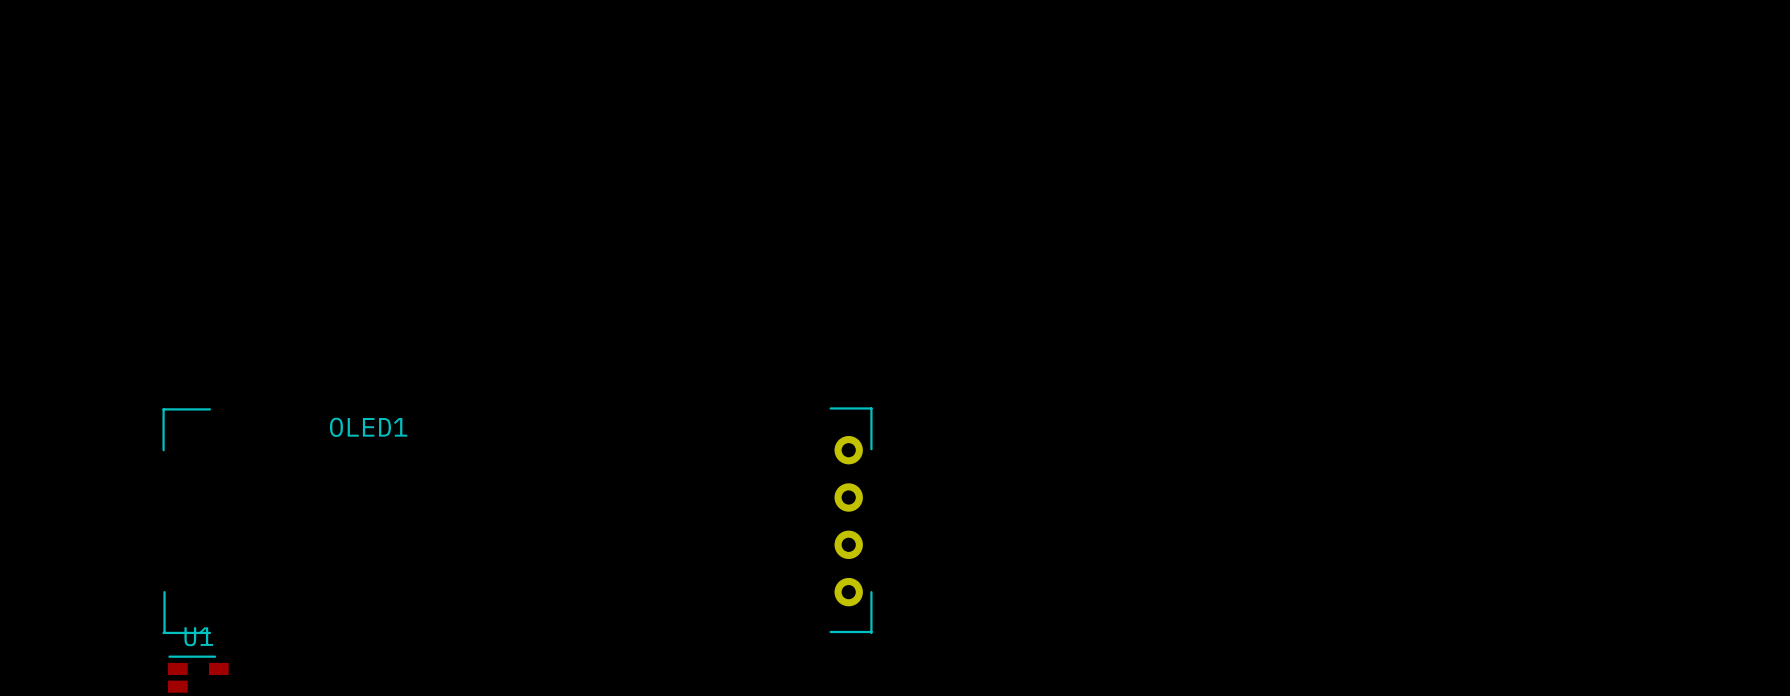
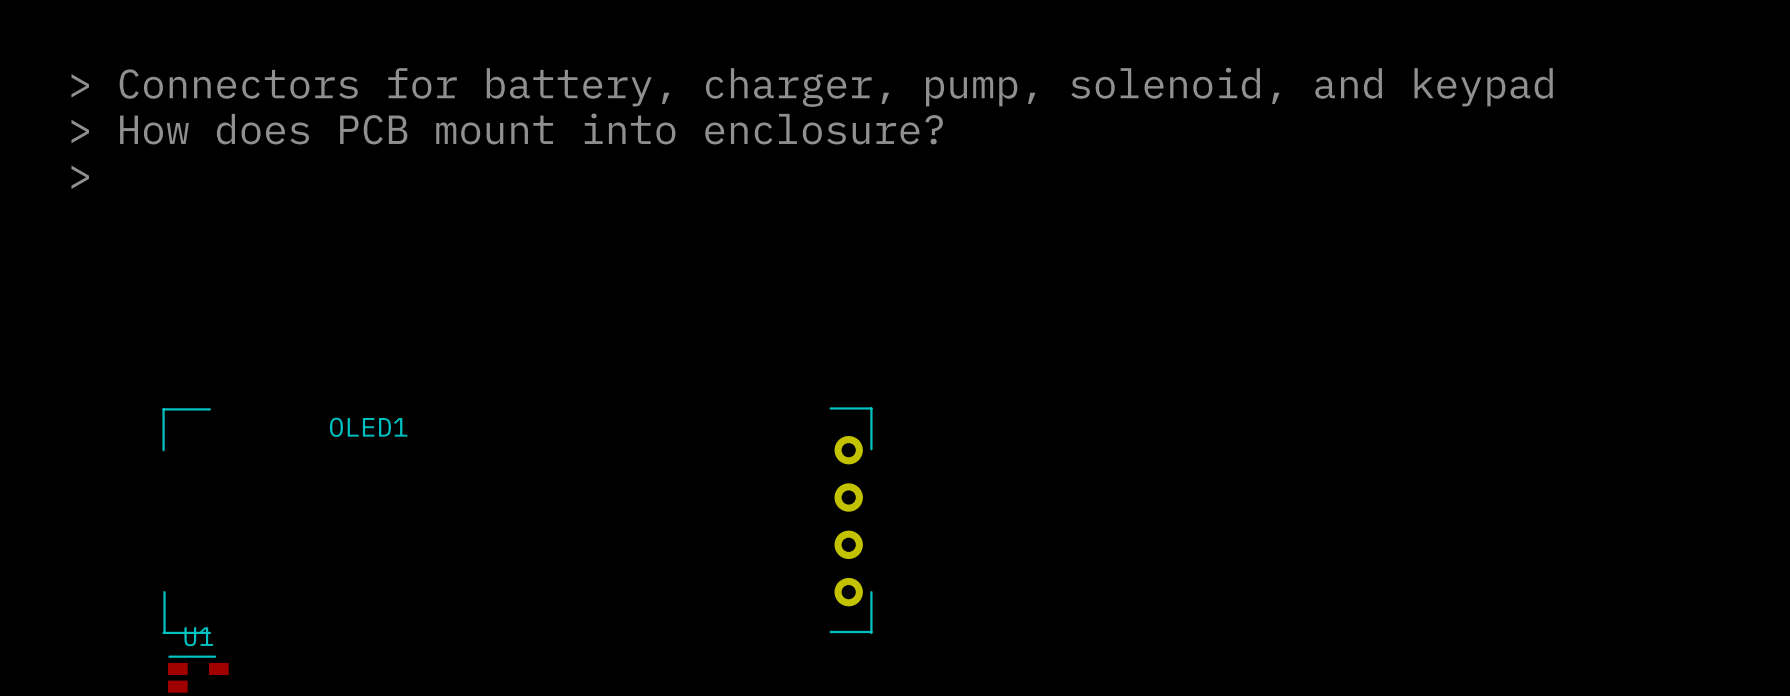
text: none -> > Connectors for battery, charger, pump, solenoid, and keypad (812, 87)
text: none -> > How does PCB mount into enclosure? (507, 128)
text: none -> > (80, 177)

